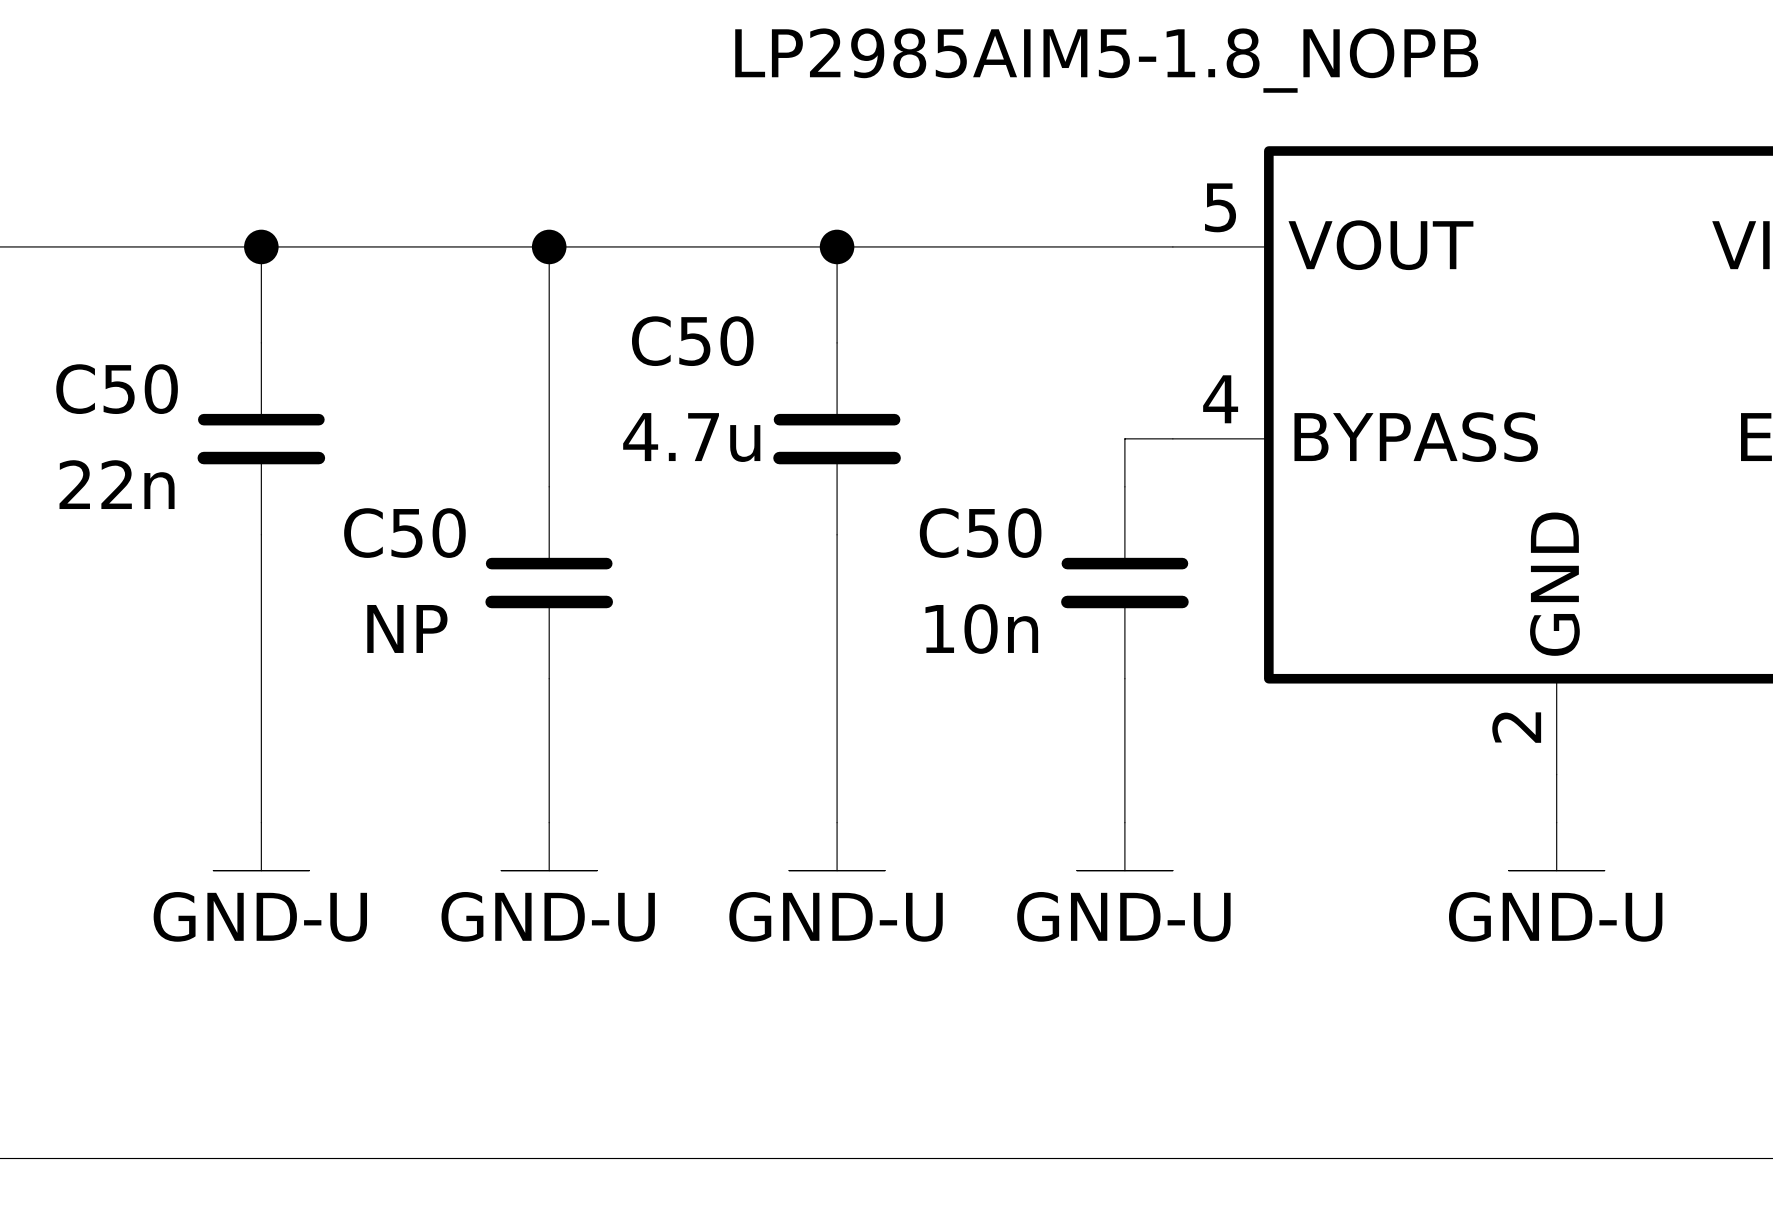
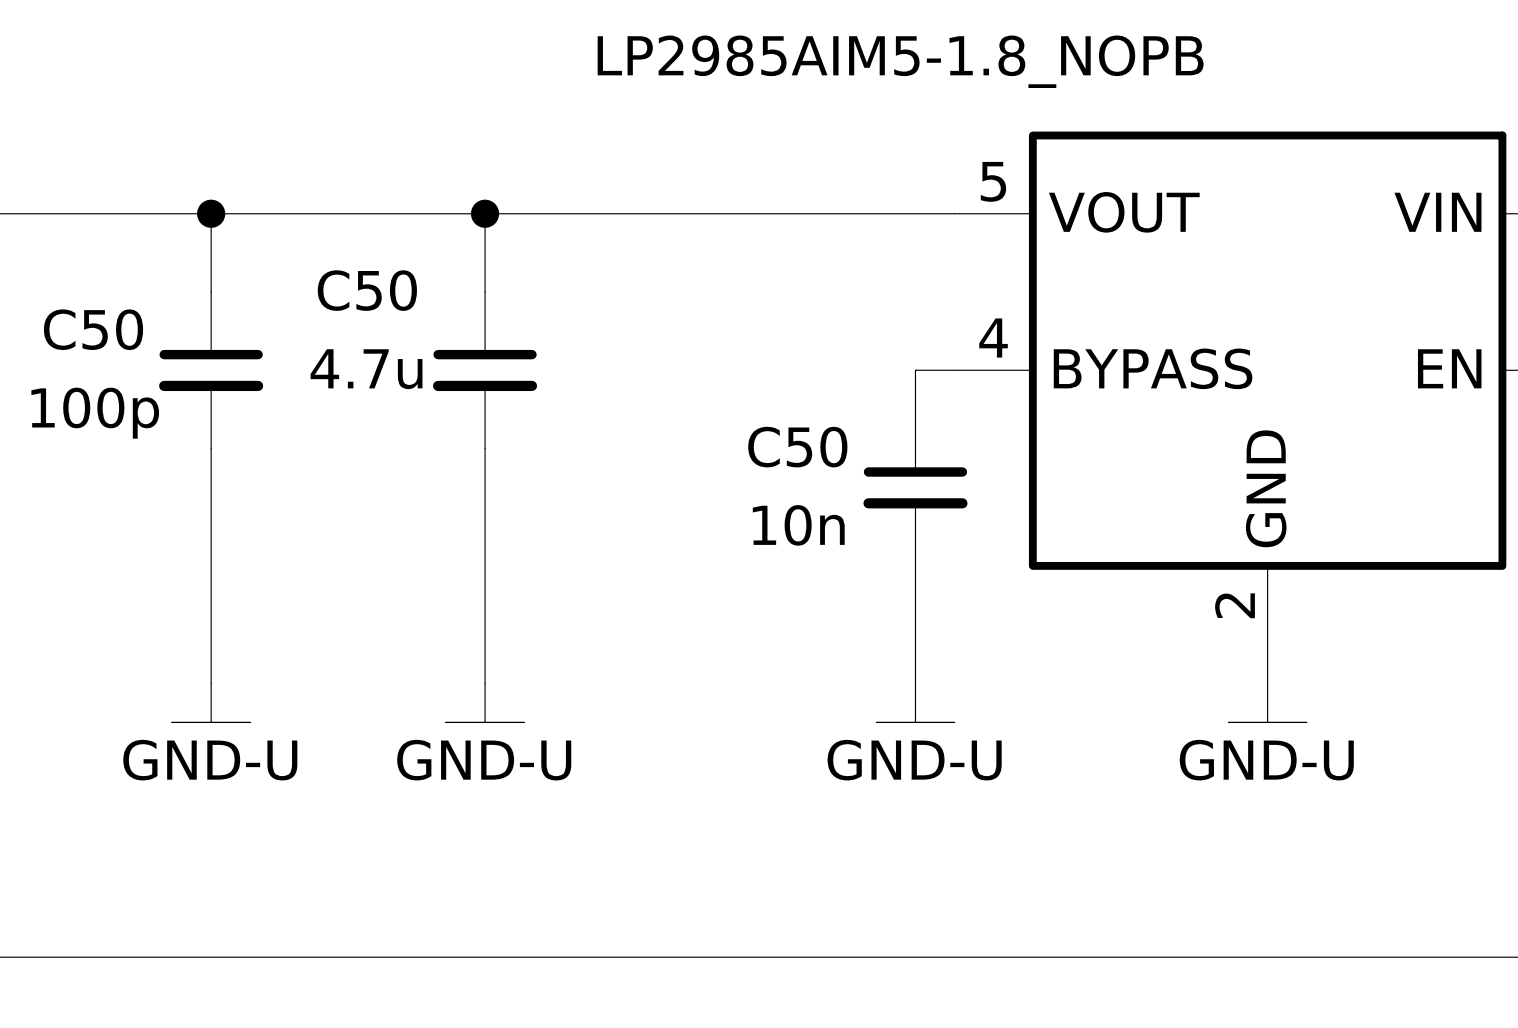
wire: (549, 246) (549, 486) -> none
junction position: (549, 246) -> (485, 213)
wire: (837, 246) (837, 342) -> (485, 213) (485, 292)
junction: (837, 246) -> none
C50 position: (837, 438) -> (485, 370)
C50 value: 22n (117, 484) -> 100p (95, 413)
wire: (837, 534) (837, 822) -> (485, 448) (485, 683)
C50: NP (549, 582) -> none
wire: (549, 678) (549, 822) -> none
power symbol position: GND-U (549, 846) -> GND-U (485, 702)
power symbol: GND-U (837, 846) -> none

